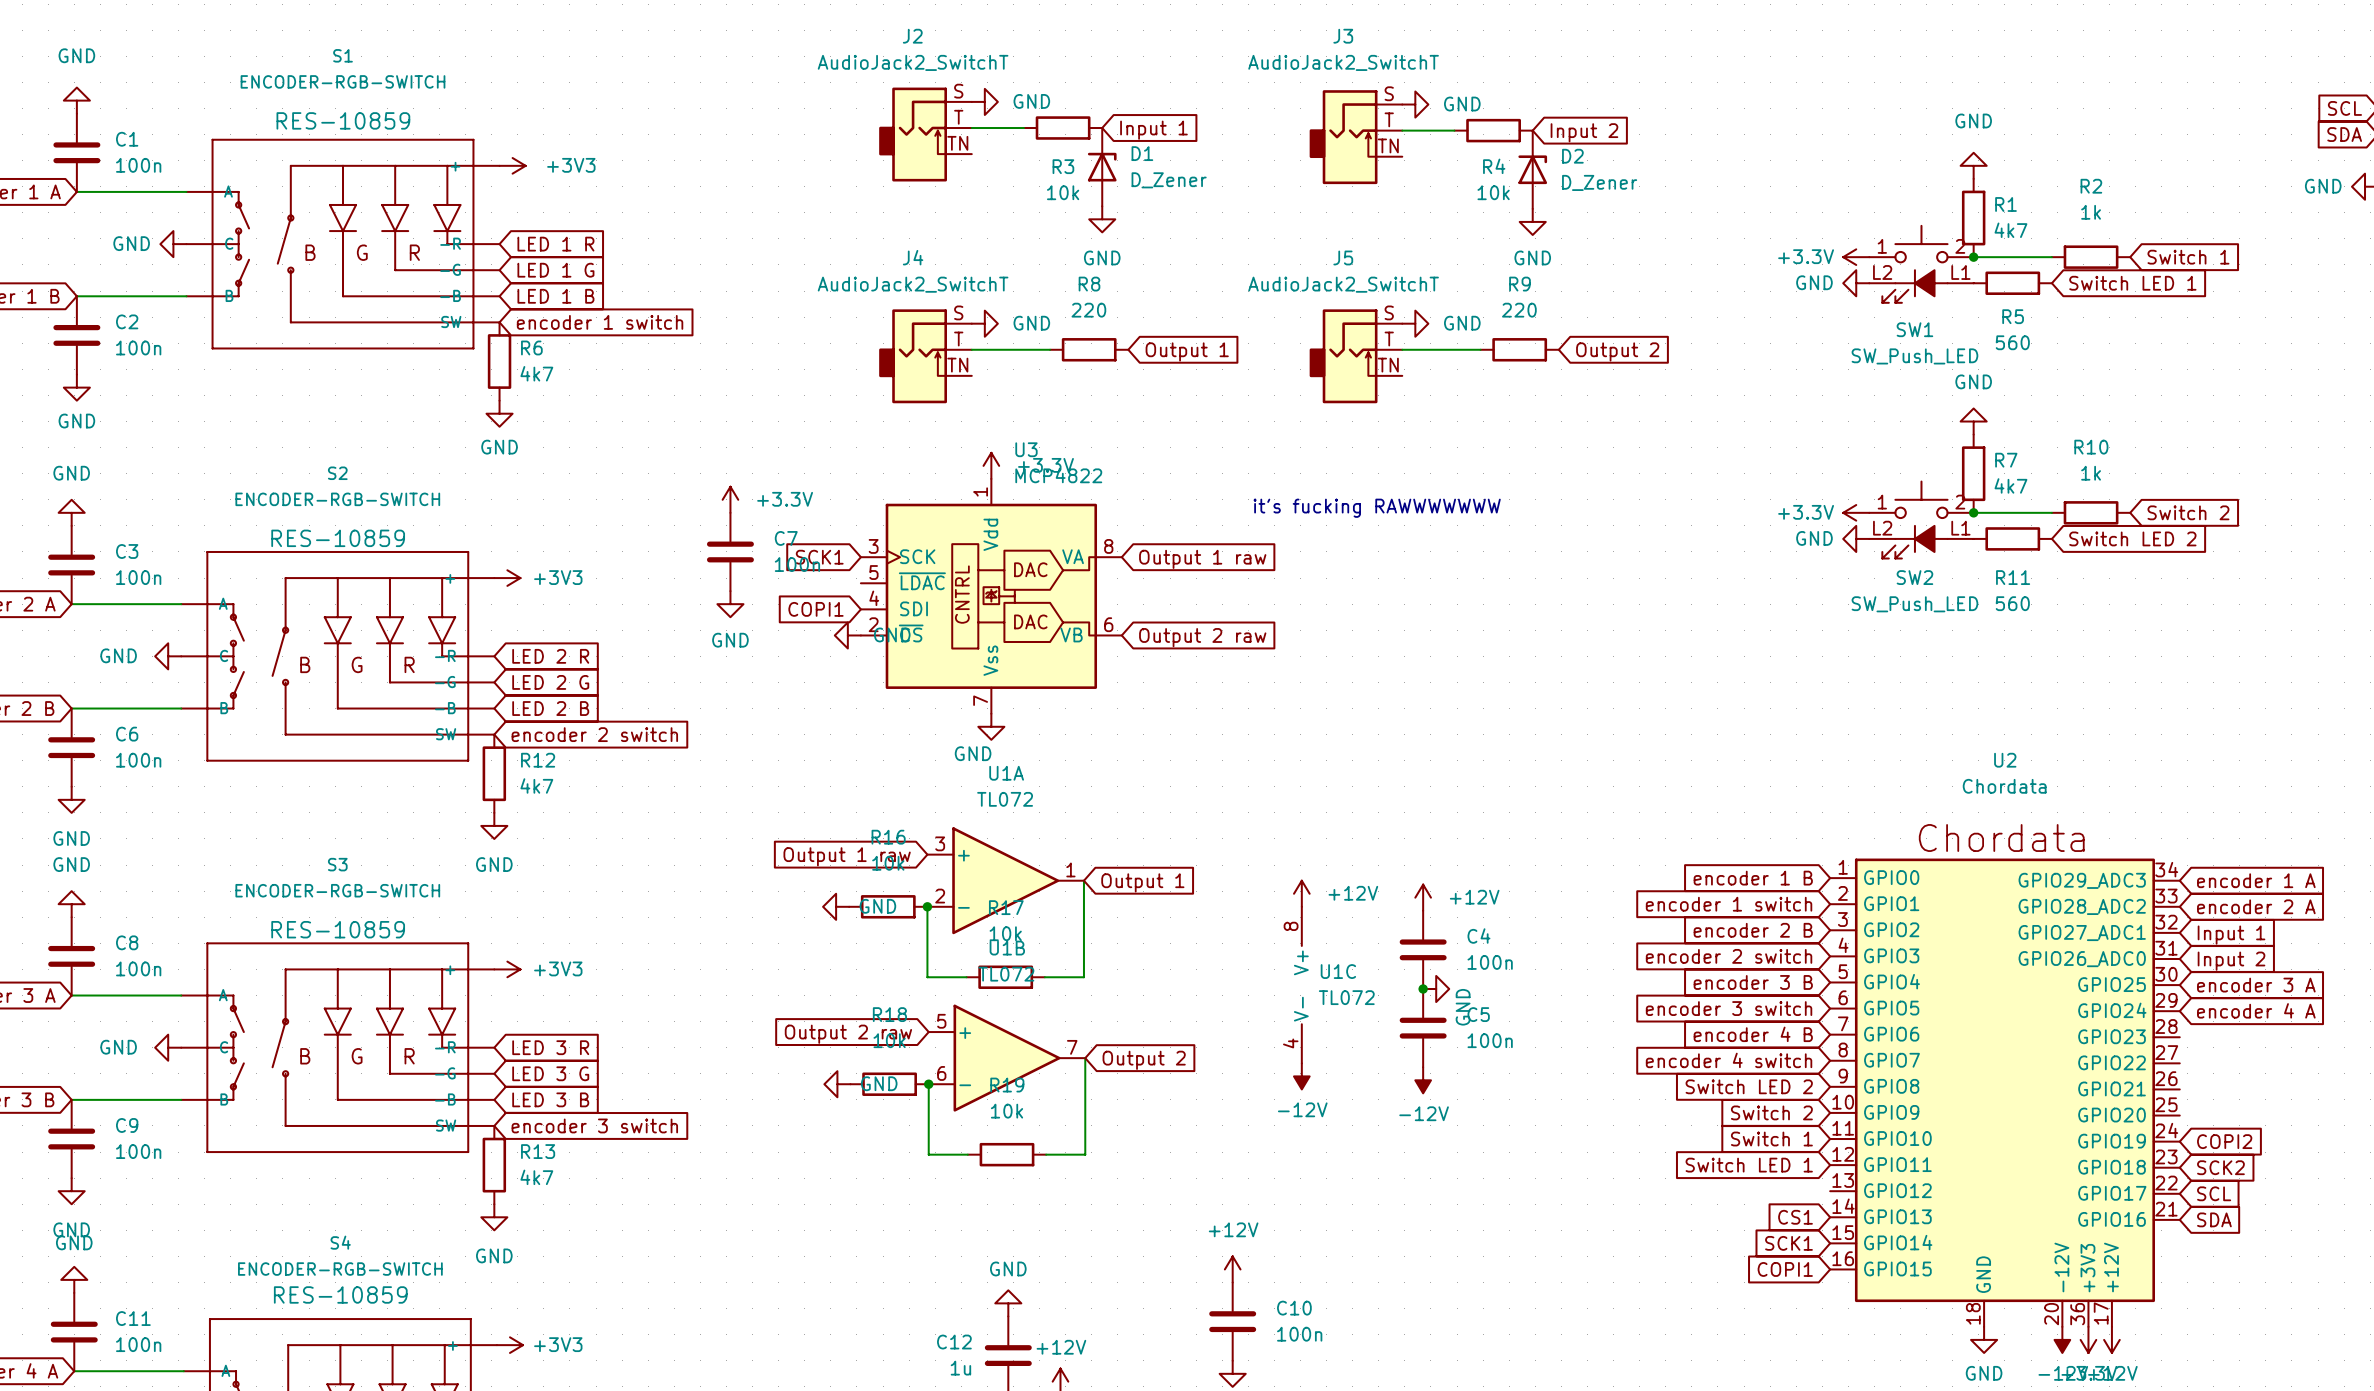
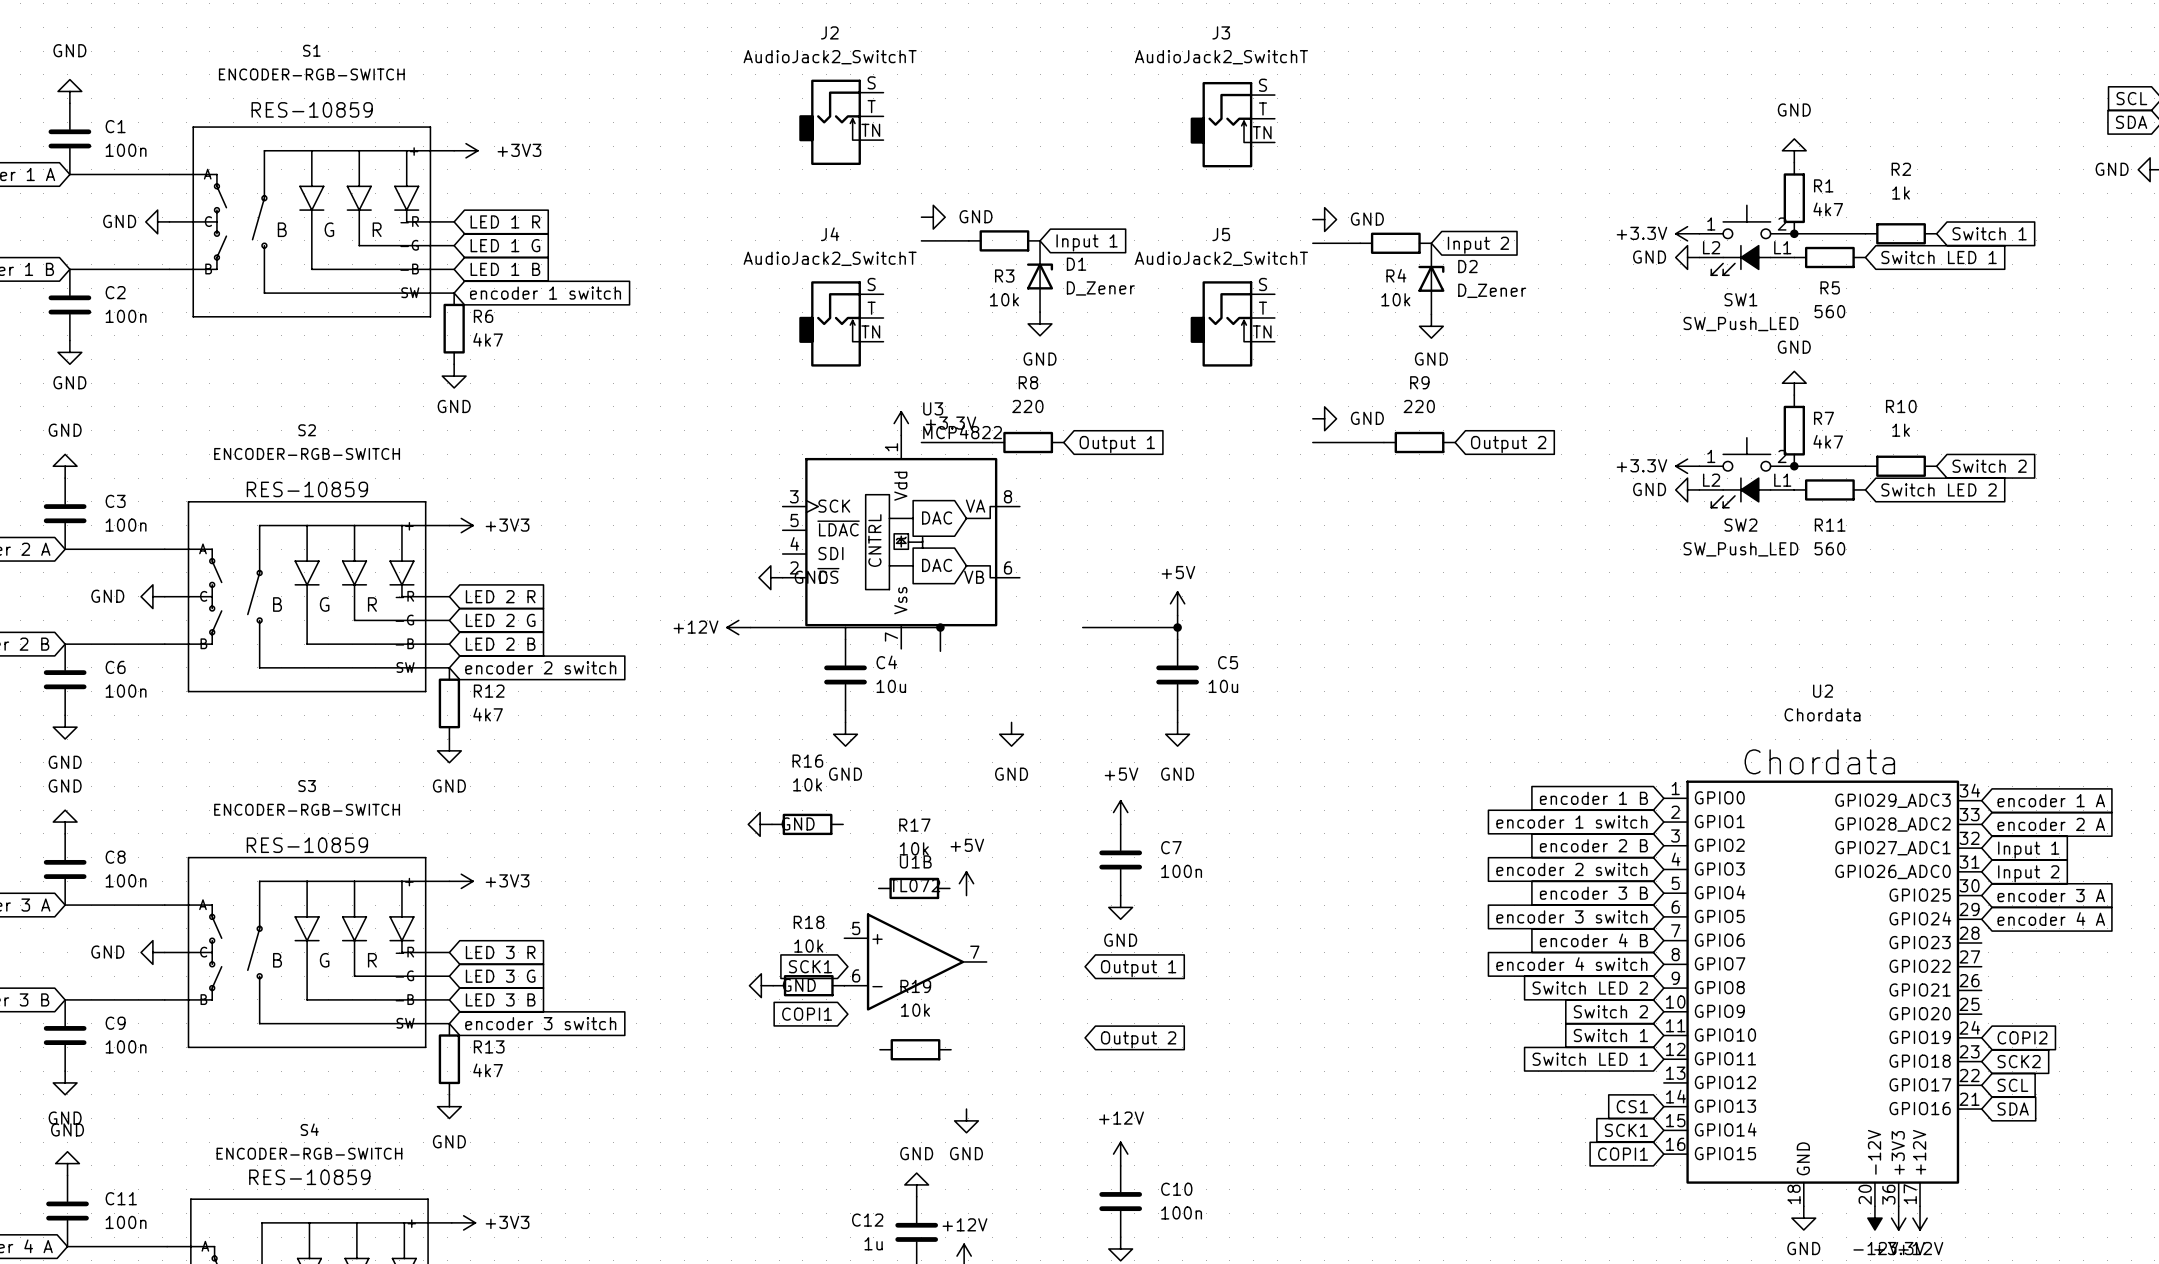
power symbol: GND (984, 101) -> none
power symbol: GND (1415, 104) -> none
wire: (971, 128) (1023, 128) -> (921, 240) (968, 240)
R3 position: (1063, 128) -> (1004, 240)
global label position: Input 1 (1153, 130) -> Input 1 (1087, 242)
wire: (1402, 130) (1454, 130) -> (1312, 243) (1360, 243)
R4 position: (1493, 130) -> (1395, 243)
global label position: Input 2 (1584, 132) -> Input 2 (1478, 245)
D1 position: (1102, 167) -> (1040, 276)
D2 position: (1532, 169) -> (1431, 278)
power symbol: GND (1102, 219) -> none
power symbol: GND (1532, 221) -> none
power symbol: none -> GND (933, 217)
power symbol: none -> GND (1324, 219)
power symbol: GND (984, 323) -> none
power symbol: GND (1415, 323) -> none
wire: (971, 349) (1050, 349) -> (921, 442) (992, 442)
R8 position: (1089, 349) -> (1028, 442)
wire: (1402, 349) (1480, 349) -> (1312, 442) (1383, 442)
R9 position: (1519, 349) -> (1419, 442)
global label position: Output 1 (1187, 351) -> Output 1 (1117, 444)
global label position: Output 2 (1617, 351) -> Output 2 (1508, 444)
power symbol: none -> GND (1040, 323)
power symbol: none -> GND (1431, 326)
power symbol: none -> GND (1324, 418)
power symbol: +3.3V (730, 499) -> none
text: it's fucking RAWWWWWWW (1377, 508) -> none
C7 position: (730, 551) -> (1120, 859)
global label: SCK1 (819, 557) -> none
global label: Output 1 raw (1202, 559) -> none
power symbol: GND (730, 604) -> none
global label: COPI1 (816, 609) -> none
global label: Output 2 raw (1202, 637) -> none
power symbol: none -> +5V (1177, 603)
wire: none -> (1177, 615) (1177, 639)
power symbol: none -> +12V (738, 627)
wire: none -> (750, 627) (940, 627) (940, 651)
wire: none -> (845, 627) (845, 639)
junction: none -> (940, 627)
wire: none -> (1082, 627) (1177, 627)
junction: none -> (1177, 627)
power symbol: GND (991, 726) -> none
wire: none -> (845, 710) (845, 722)
wire: none -> (1177, 710) (1177, 722)
power symbol: none -> GND (845, 734)
power symbol: none -> GND (1011, 734)
power symbol: none -> GND (1177, 734)
global label: Output 1 raw (847, 856) -> none
U1A: TL072 (1005, 880) -> none
wire: (1083, 880) (1083, 977) (1044, 977) -> none
global label: Output 1 (1142, 882) -> none
power symbol: none -> +5V (1120, 812)
power symbol: +12V (1301, 893) -> none
power symbol: +12V (1423, 897) -> none
wire: (927, 906) (927, 977) (966, 977) -> none
junction: (927, 906) -> none
C4 name position: C4 (1478, 936) -> C4 (886, 662)
C4 position: (1423, 949) -> (845, 674)
C4 value: 100n (1490, 962) -> 10u (891, 686)
power symbol: none -> +5V (966, 883)
U1C: TL072 (1301, 985) -> none
junction: (1423, 988) -> none
power symbol: GND (1436, 988) -> none
power symbol: none -> GND (1120, 907)
C5 position: (1423, 1028) -> (1177, 674)
global label: Output 2 raw (848, 1034) -> none
C5 value: 100n (1490, 1040) -> 10u (1223, 686)
wire: (1085, 1058) (1085, 1154) (1046, 1154) -> none
global label position: Output 2 (1144, 1060) -> Output 2 (1138, 1039)
global label: none -> SCK1 (810, 966)
global label: none -> Output 1 (1138, 968)
power symbol: -12V (1301, 1076) -> none
power symbol: -12V (1423, 1080) -> none
wire: (928, 1084) (928, 1154) (967, 1154) -> none
junction: (928, 1084) -> none
global label: none -> COPI1 (807, 1014)
power symbol: none -> GND (966, 1120)

